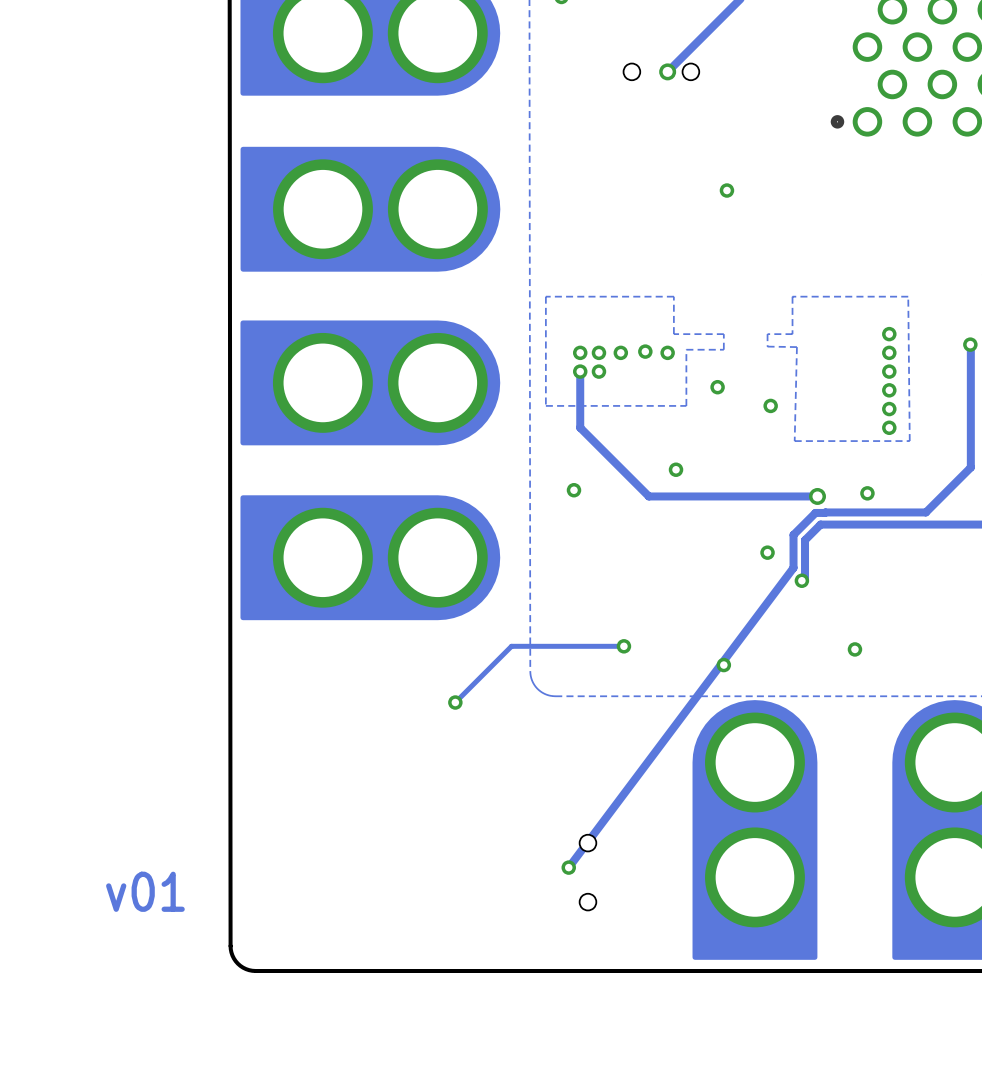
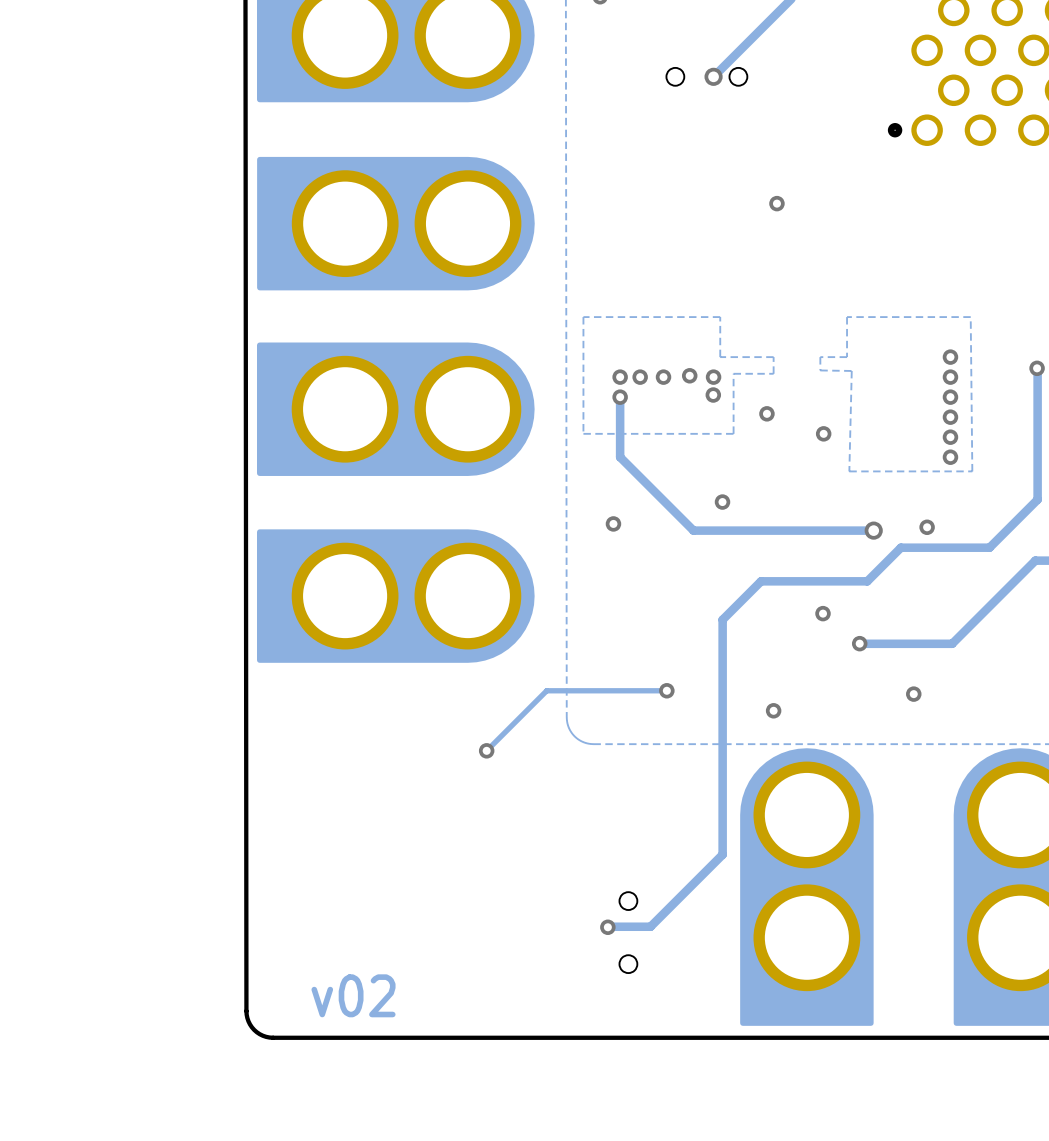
via position: (598, 371) -> (713, 395)
track: (842, 512) (815, 512) (793, 534) (793, 567) (568, 867) -> (900, 547) (867, 581) (761, 581) (722, 619) (722, 854) (650, 926) (607, 927)
track: (968, 524) (820, 524) (805, 540) (805, 577) (801, 580) -> (1035, 560) (952, 643) (859, 643)
via: (767, 552) -> none
via: none -> (823, 613)
via: (801, 580) -> none
via: none -> (859, 643)
text: v01 (145, 891) -> none
text: none -> v02 (353, 995)

